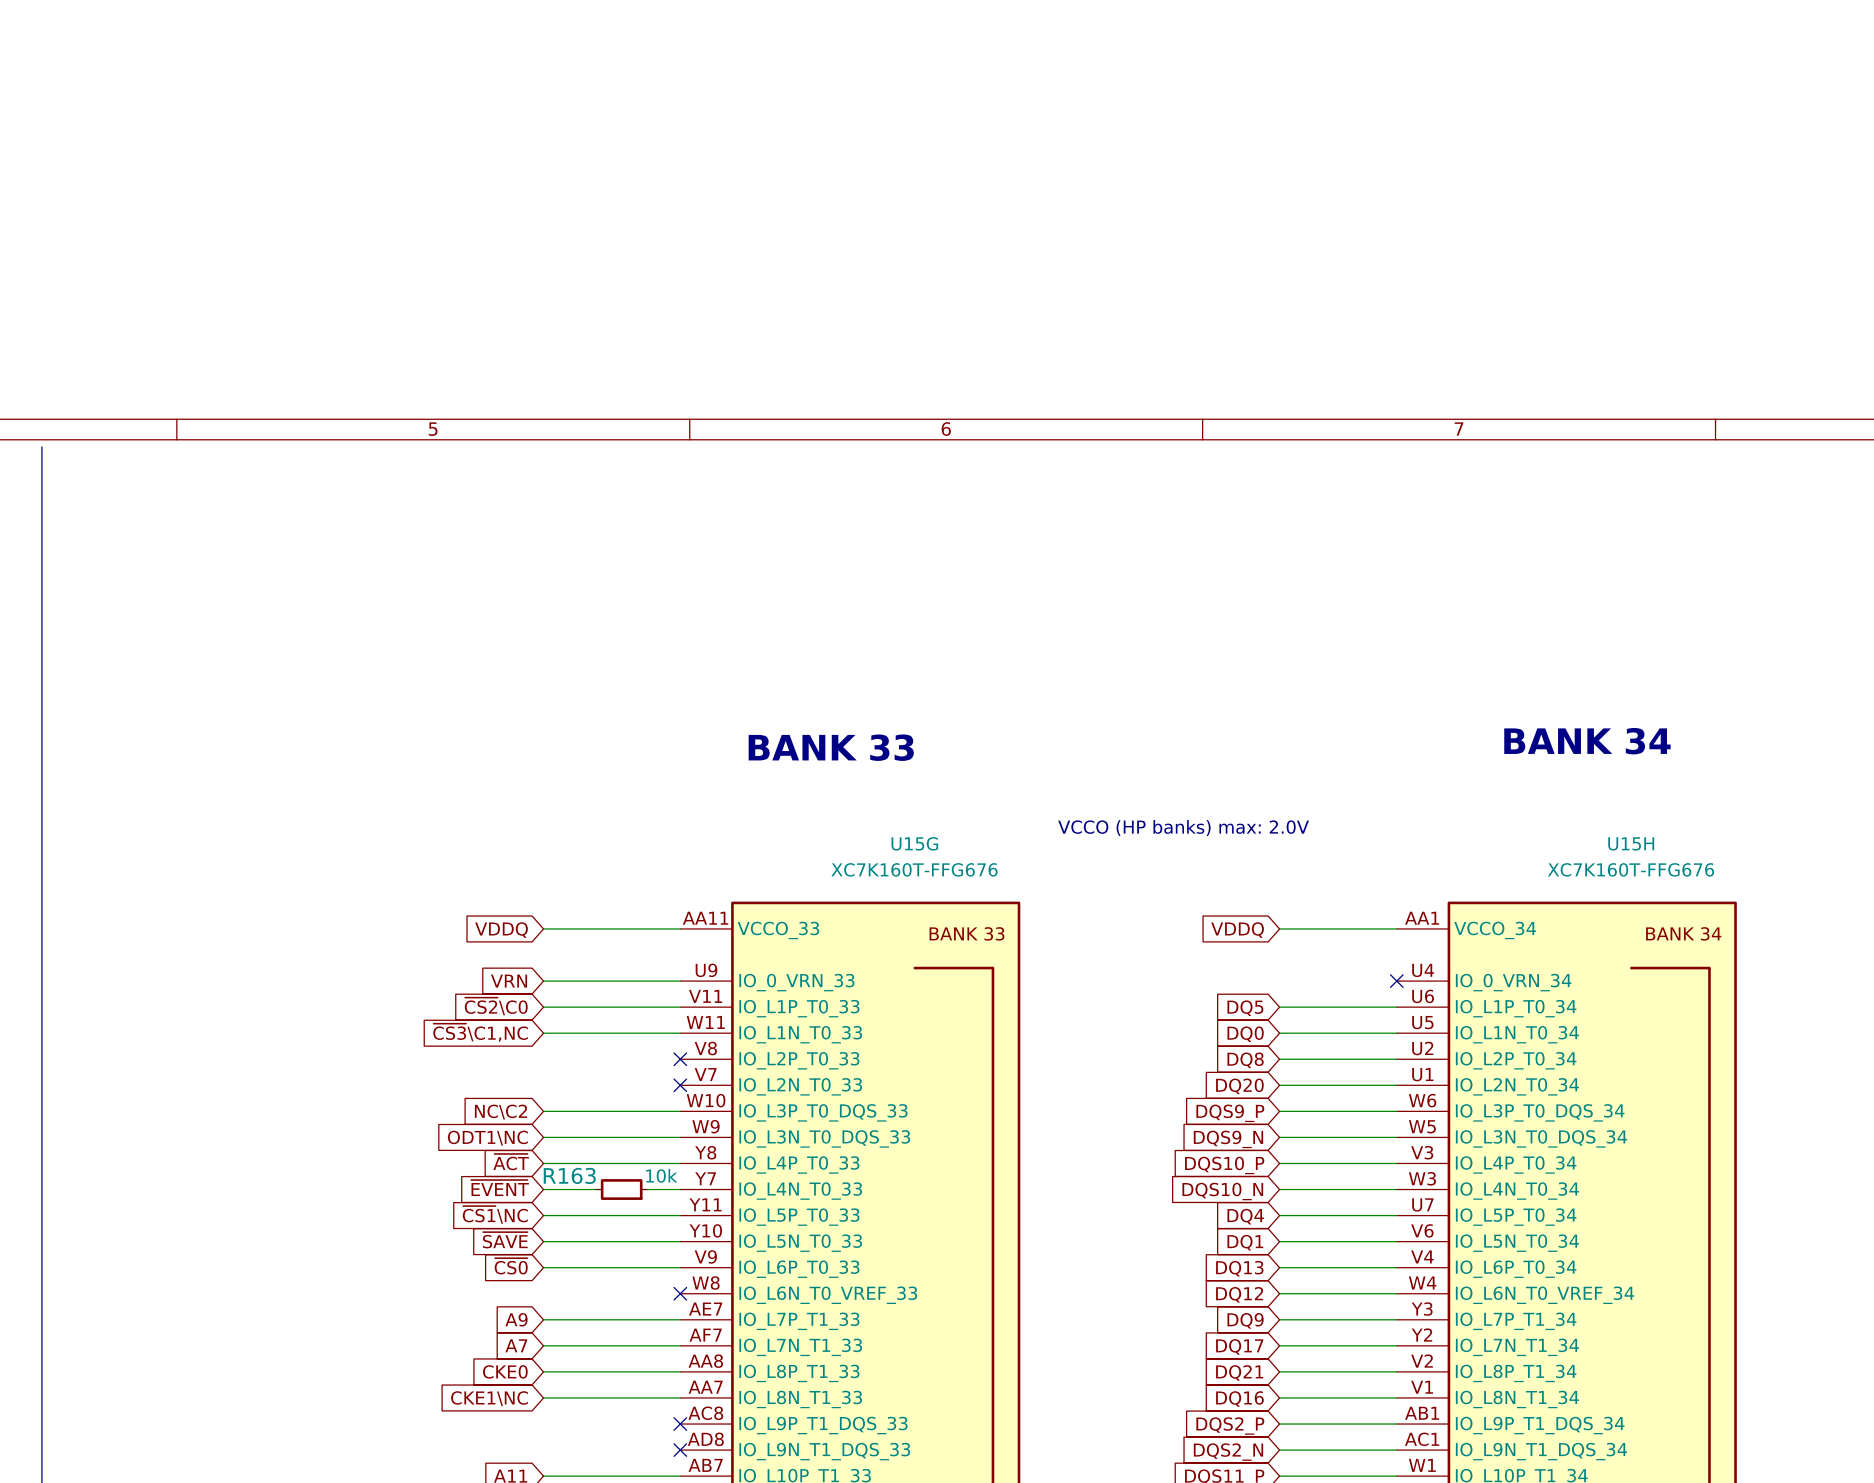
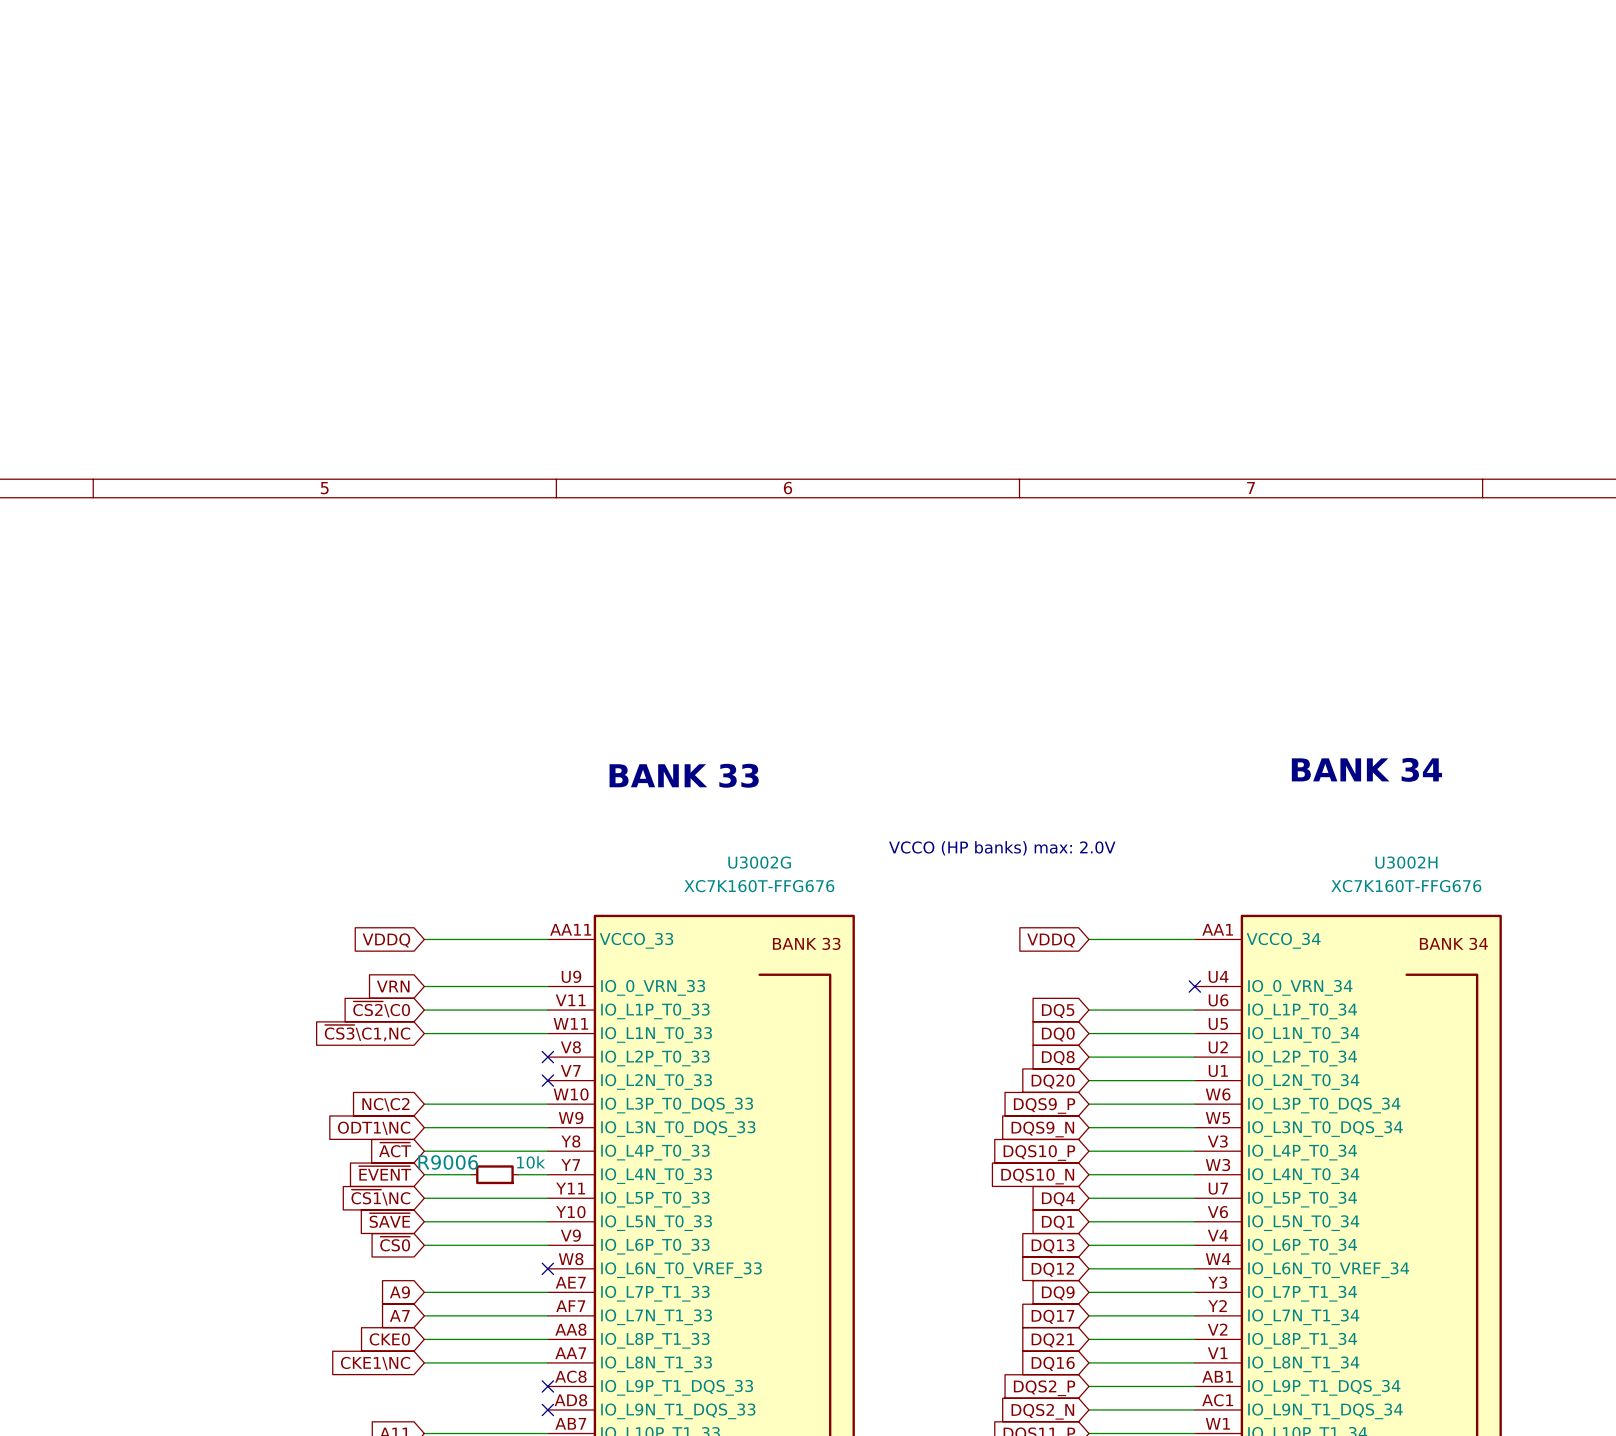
U15G name: U15G (914, 843) -> U3002G (759, 862)
U15H name: U15H (1631, 843) -> U3002H (1406, 862)
R163 name: R163 (569, 1175) -> R9006 (448, 1162)

